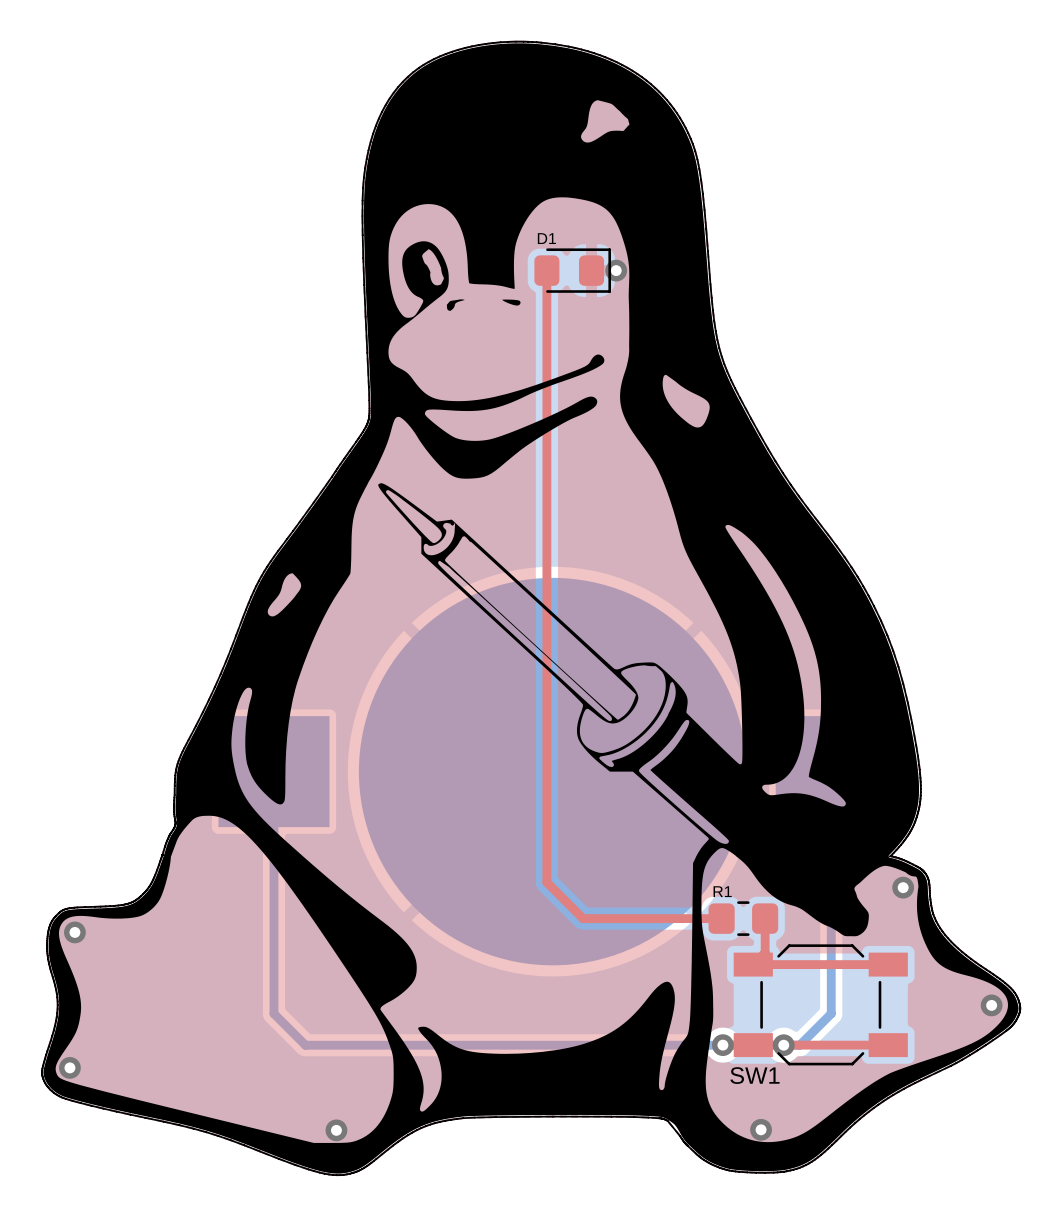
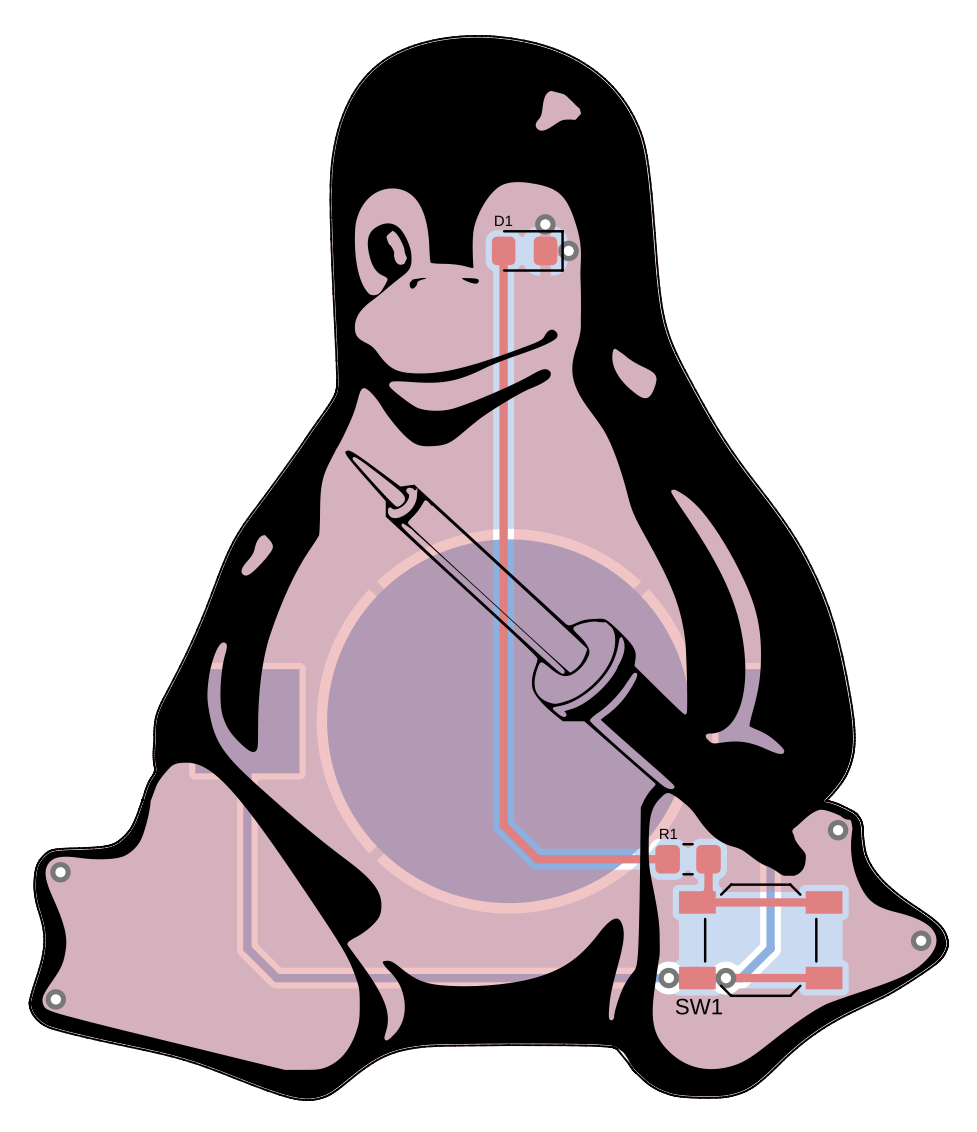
via: none -> (545, 224)
via: (761, 1129) -> none
via: (336, 1130) -> none

